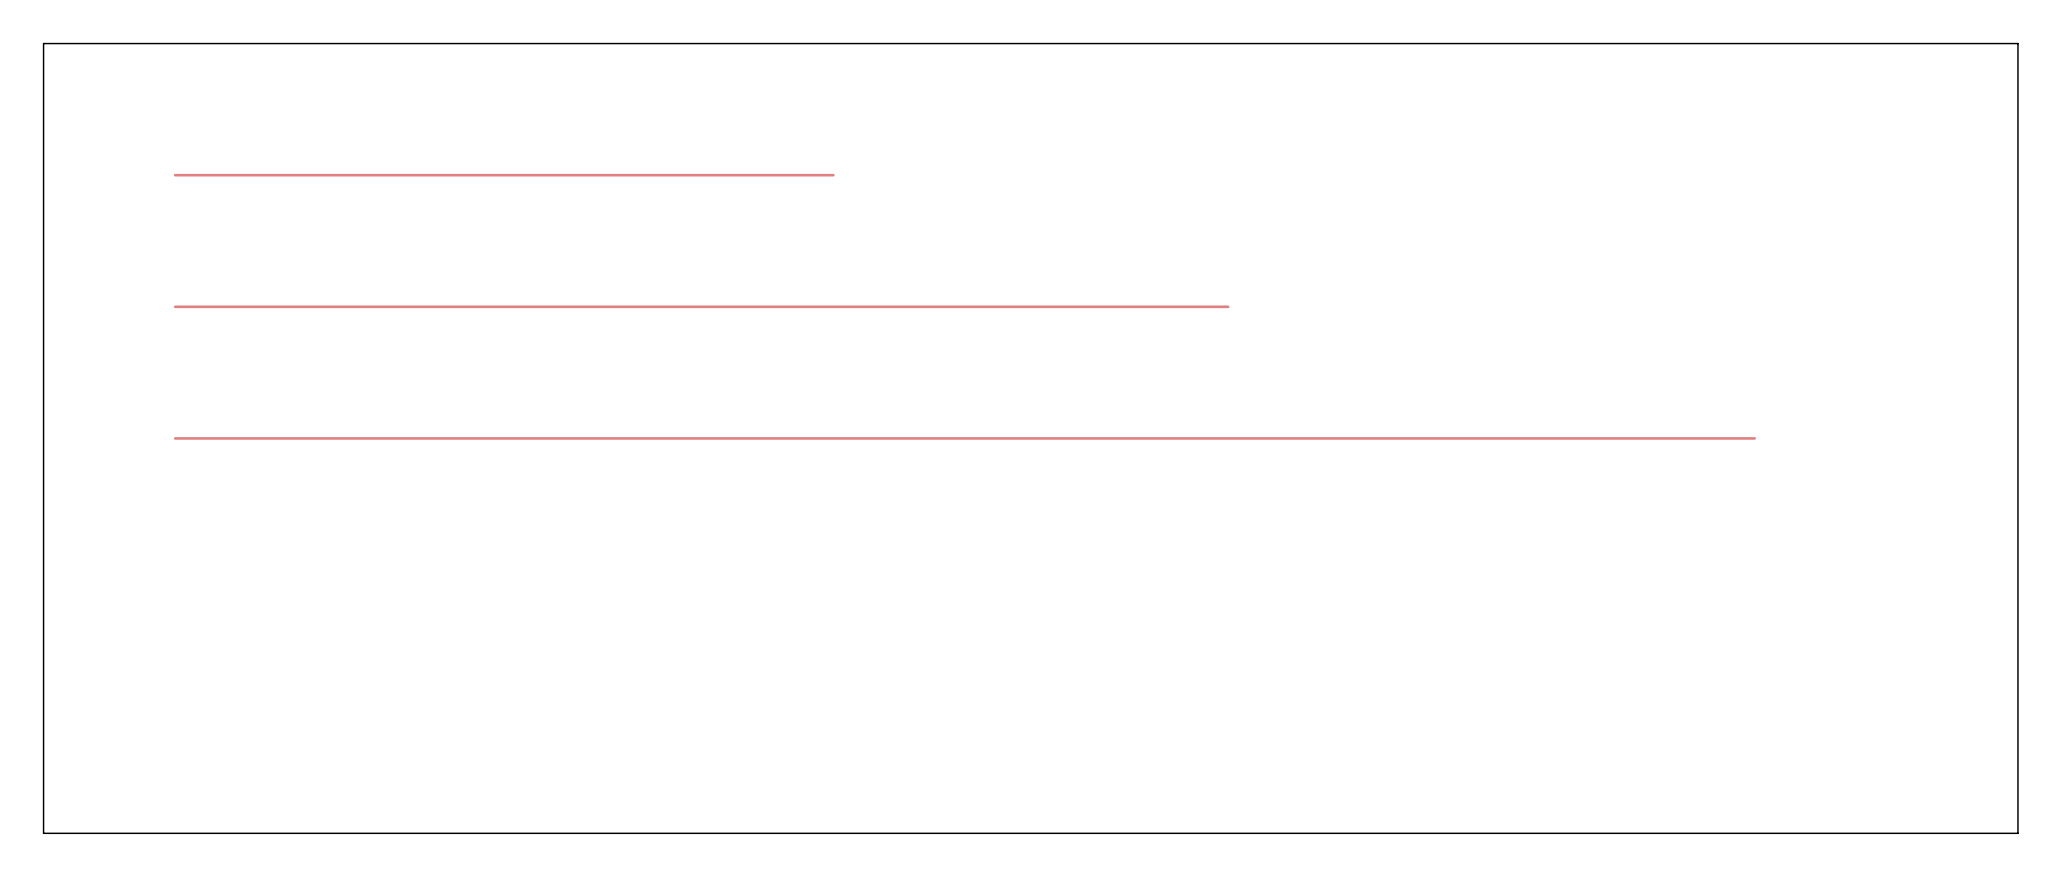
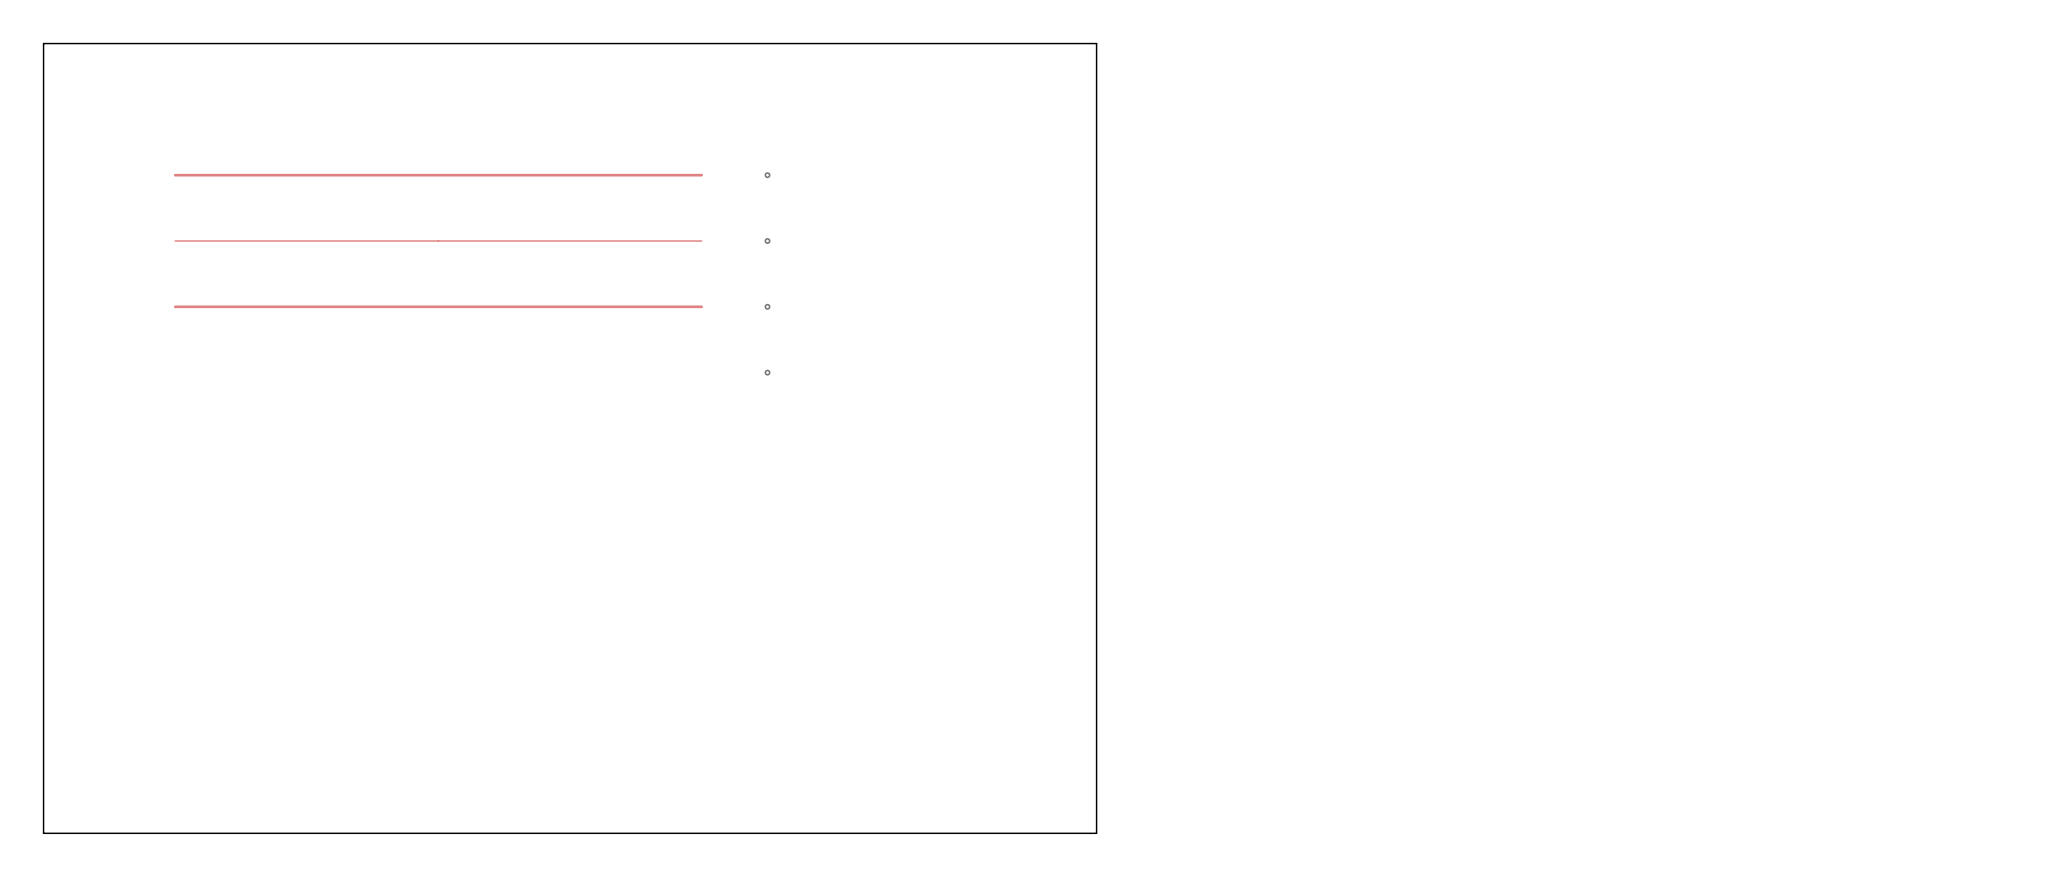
board edge: (1096, 43) (2017, 43) (2017, 833) (1096, 833) -> (1096, 43) (1096, 833)
track: (701, 175) (833, 175) -> none
via: none -> (767, 175)
track: none -> (175, 241) (701, 241)
via: none -> (767, 241)
track: (701, 306) (1228, 306) -> none
via: none -> (767, 306)
via: none -> (767, 372)
track: (175, 438) (1754, 438) -> none

